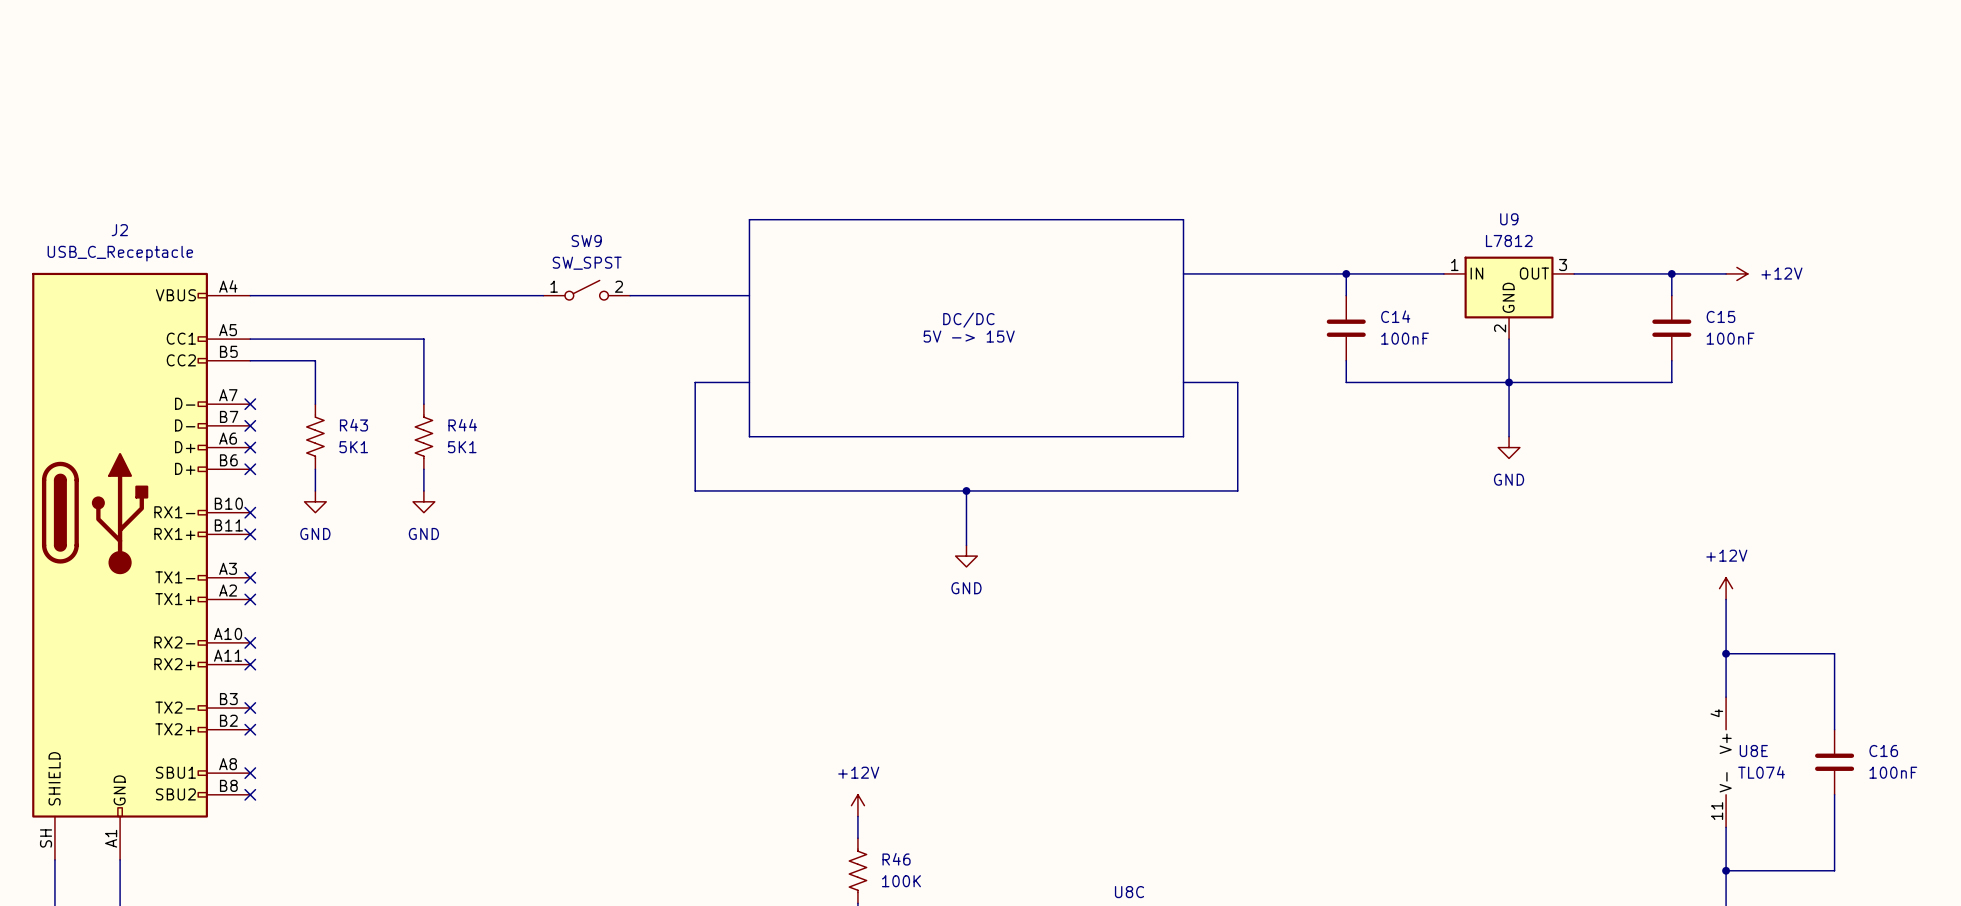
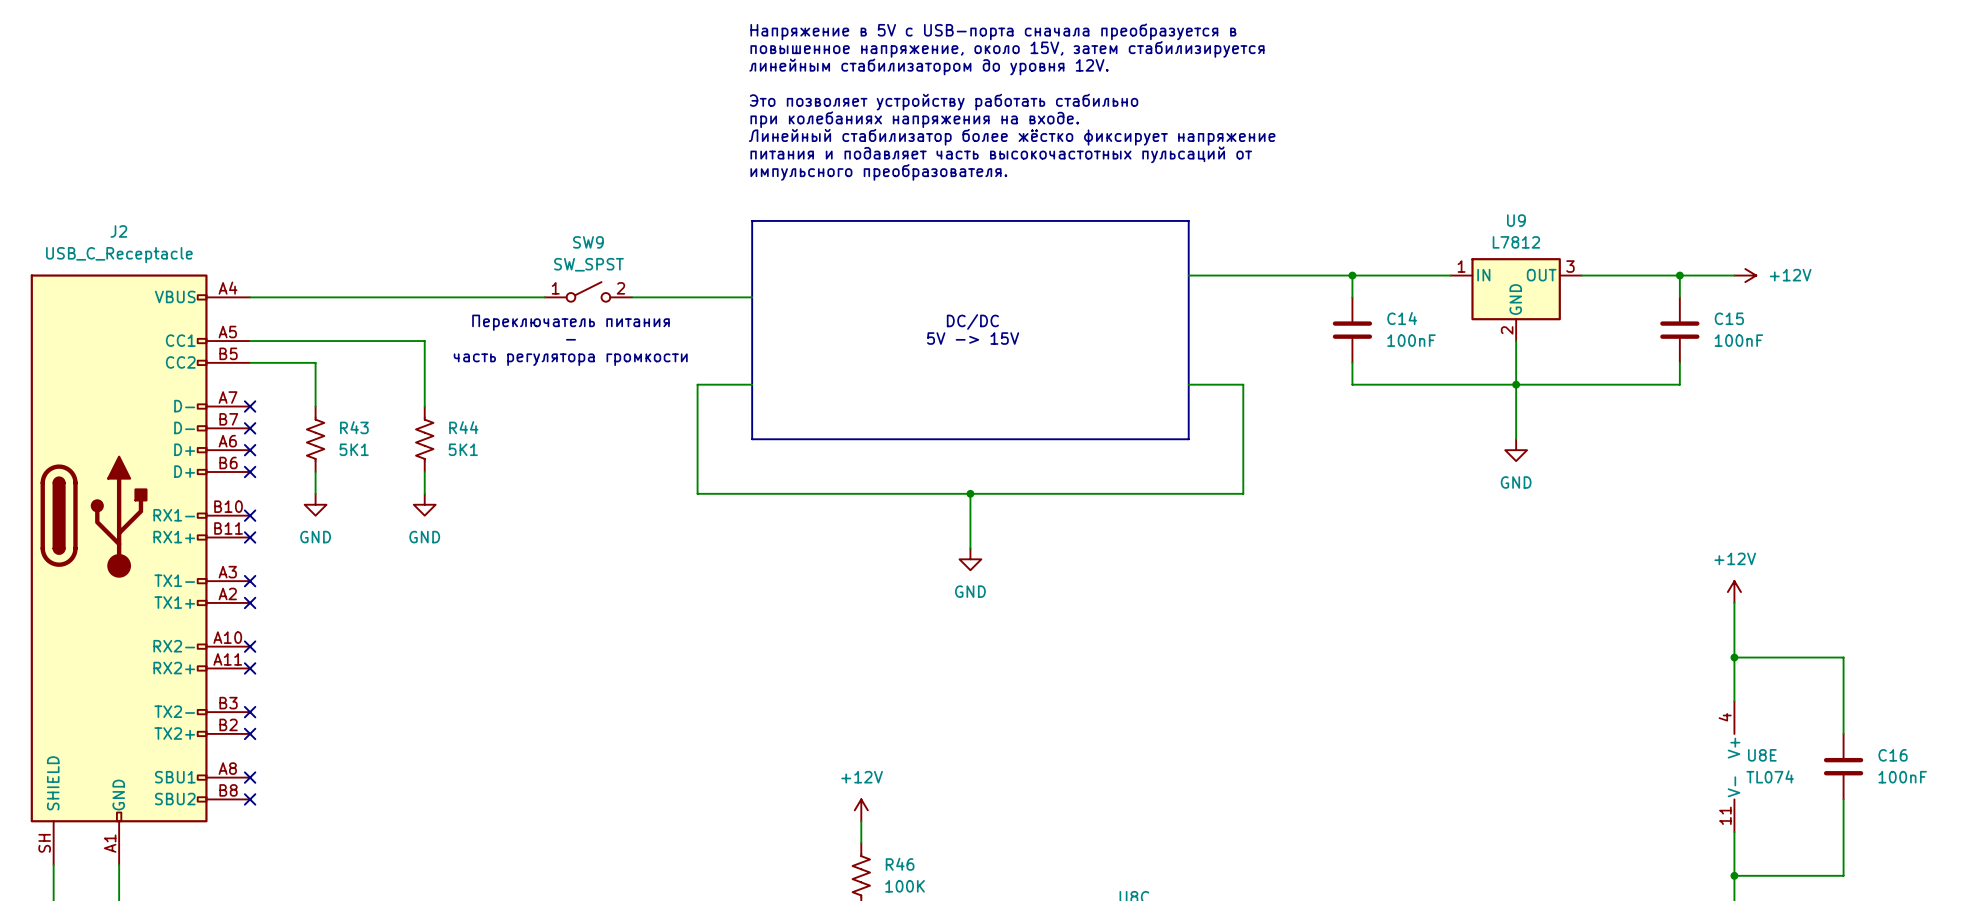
text: none -> Напряжение в 5V с USB-порта сначала преобразуется в (993, 31)
text: none -> повышенное напряжение, около 15V, затем стабилизируется (1007, 49)
text: none -> линейным стабилизатором до уровня 12V. (928, 66)
text: none -> Это позволяет устройству работать стабильно (944, 102)
text: none -> при колебаниях напряжения на входе. (914, 119)
text: none -> Линейный стабилизатор более жёстко фиксирует напряжение (1012, 137)
text: none -> питания и подавляет часть высокочастотных пульсаций от (1001, 154)
text: none -> импульсного преобразователя. (878, 172)
text: none -> Переключатель питания (570, 322)
text: none -> - (570, 339)
text: none -> часть регулятора громкости (570, 359)

